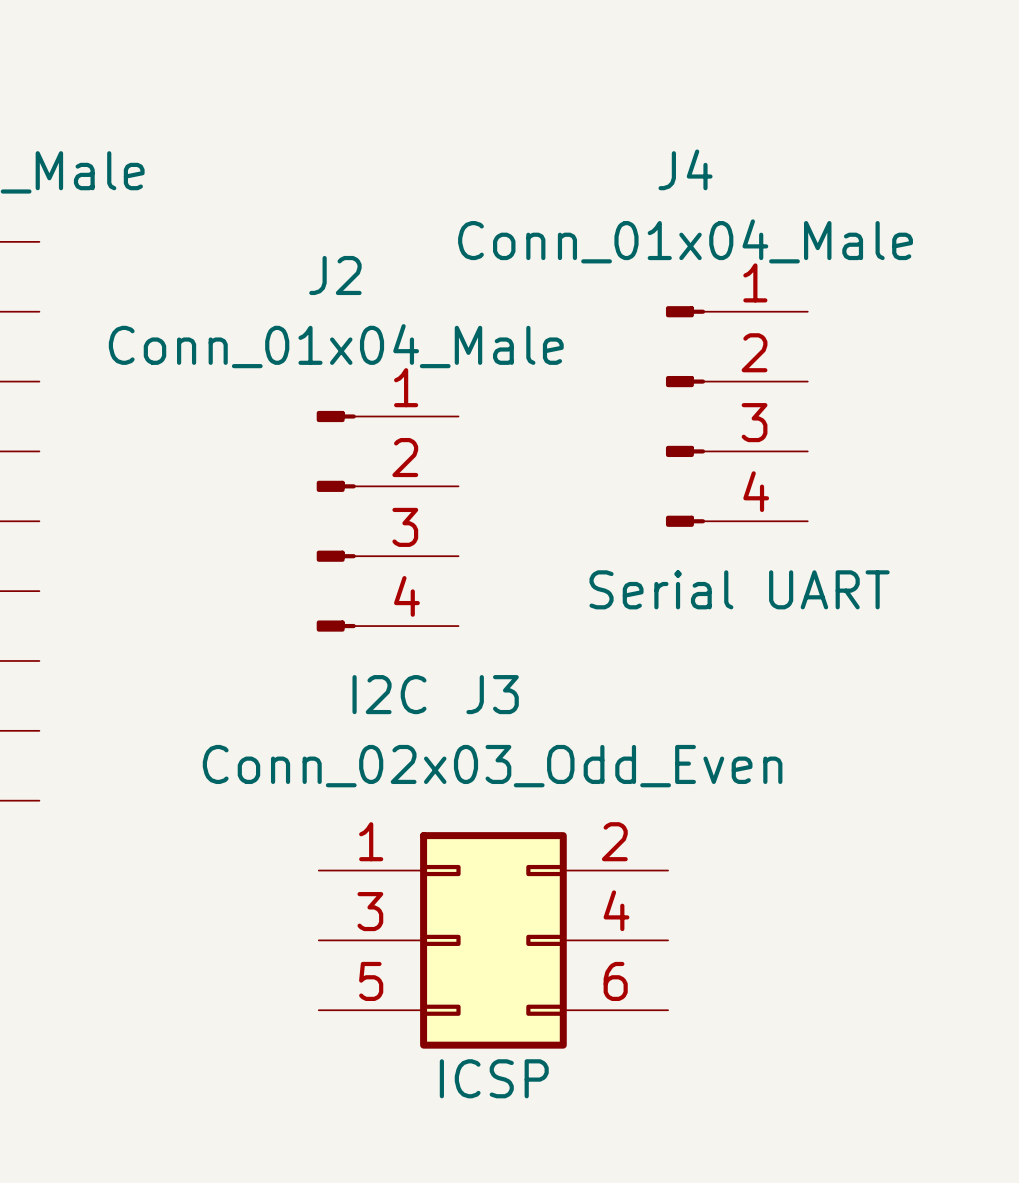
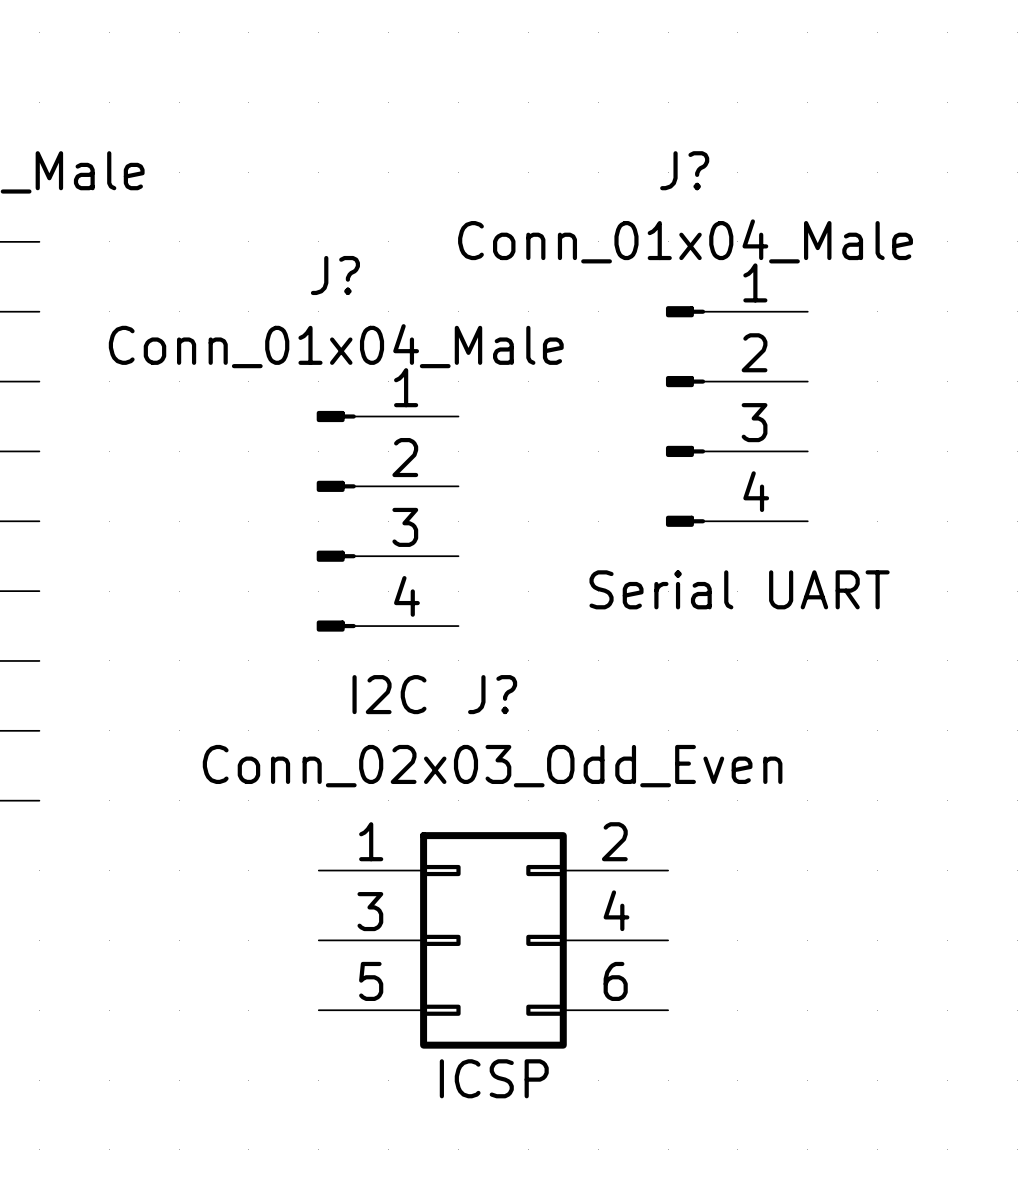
J4 name: J4 (685, 169) -> J? (684, 170)
J2 name: J2 (335, 275) -> J? (335, 275)
J3 name: J3 (492, 694) -> J? (492, 694)

